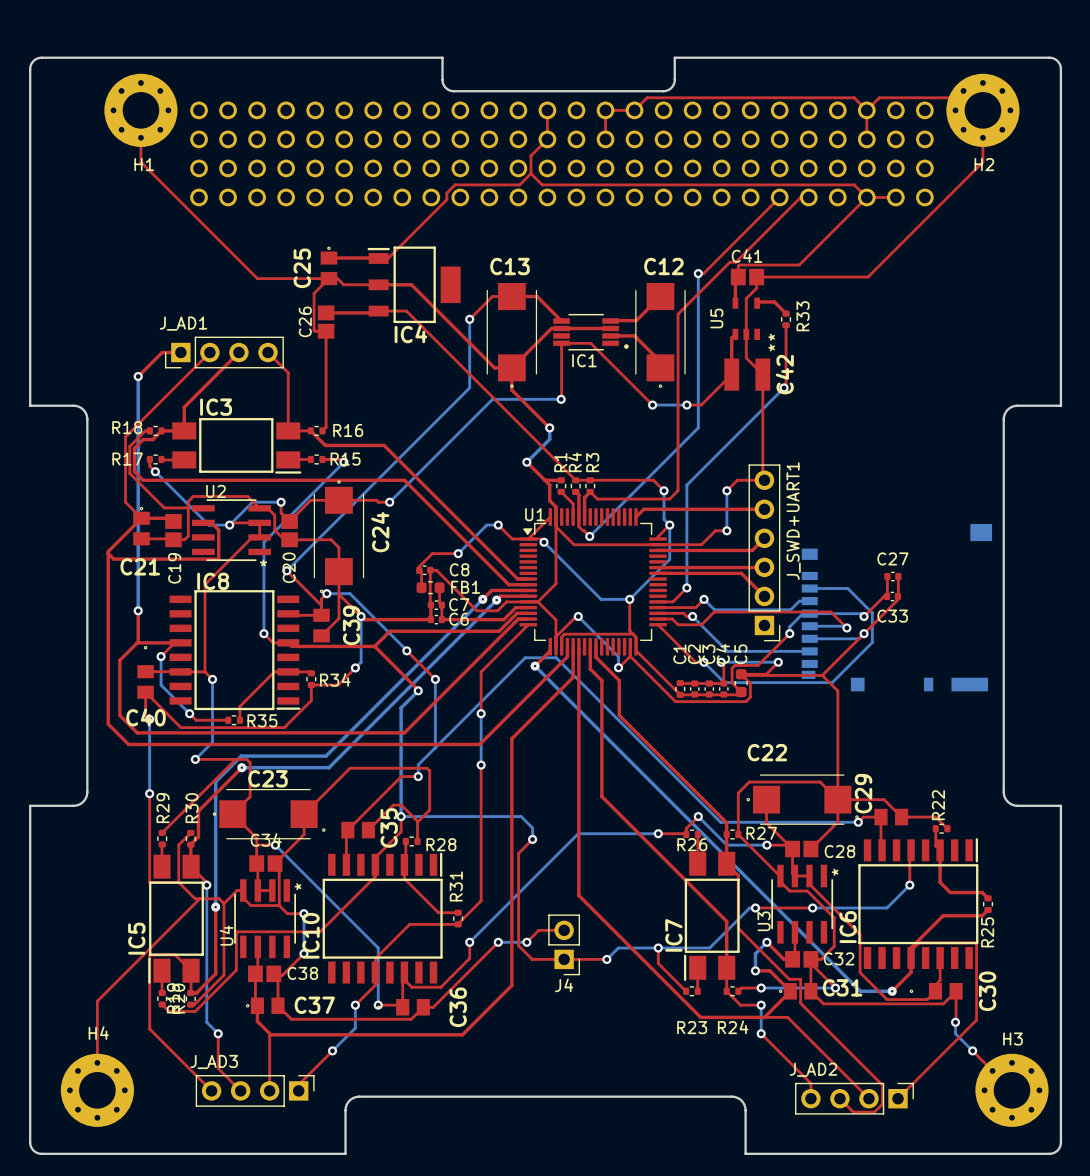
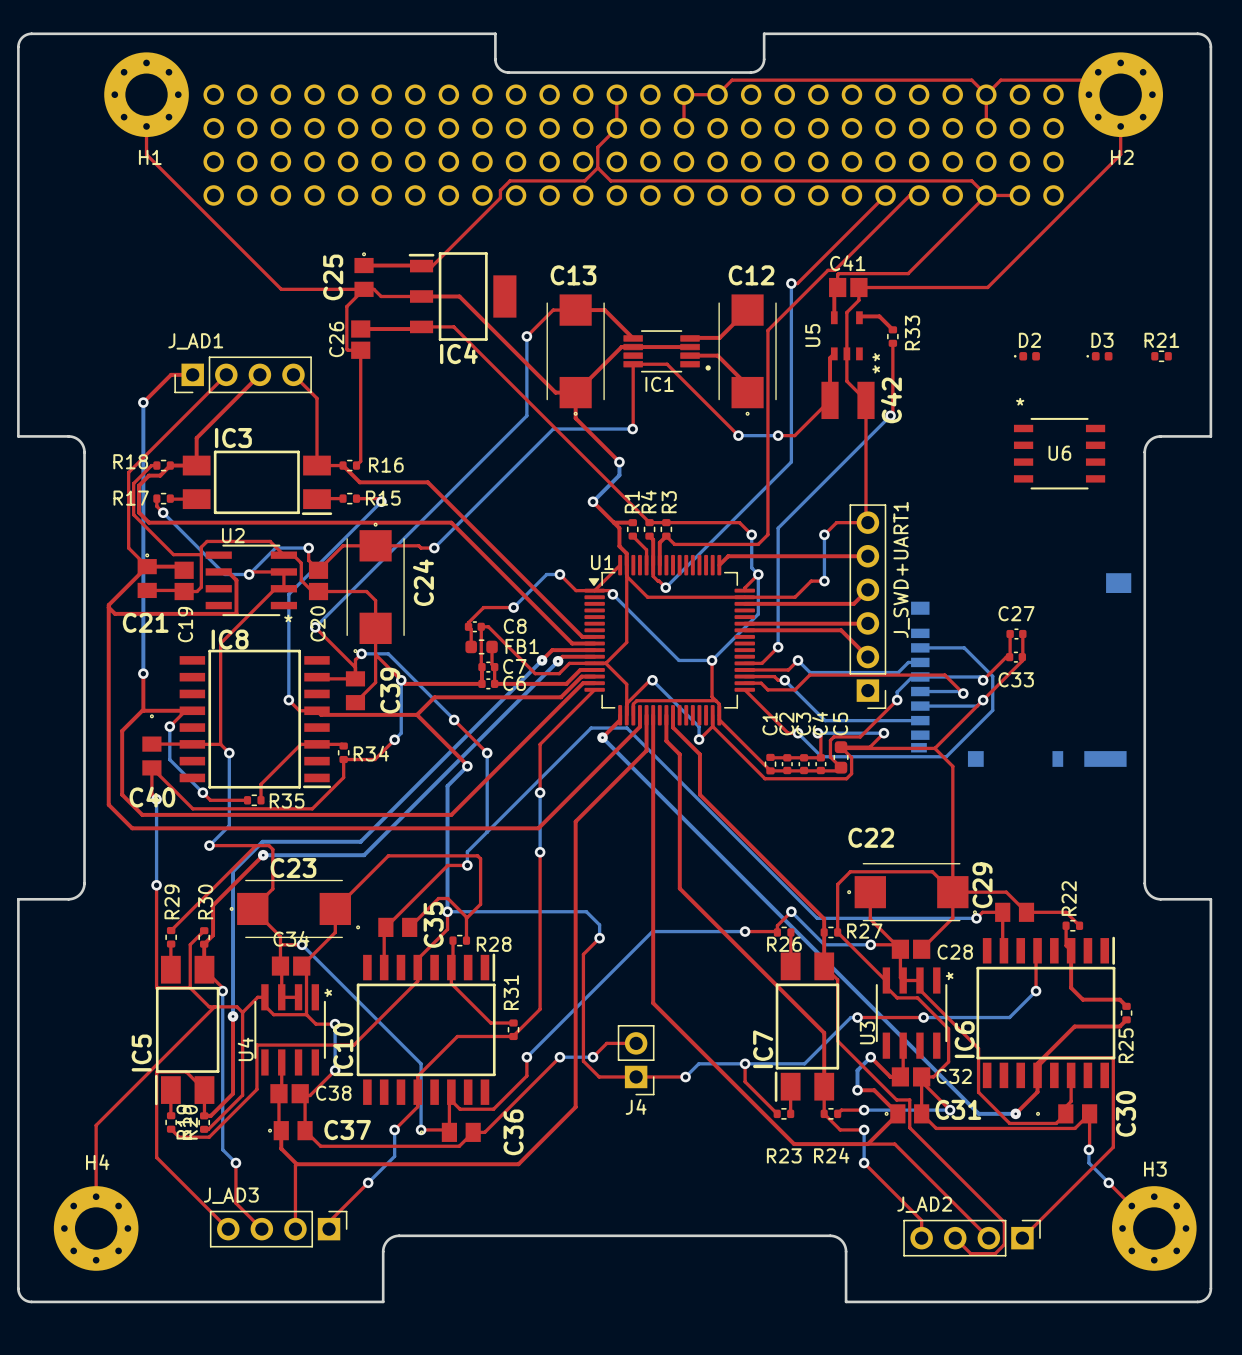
D2: none -> (1026, 356)
D3: none -> (1099, 356)
R21: none -> (1161, 356)
U6: none -> (1059, 453)

